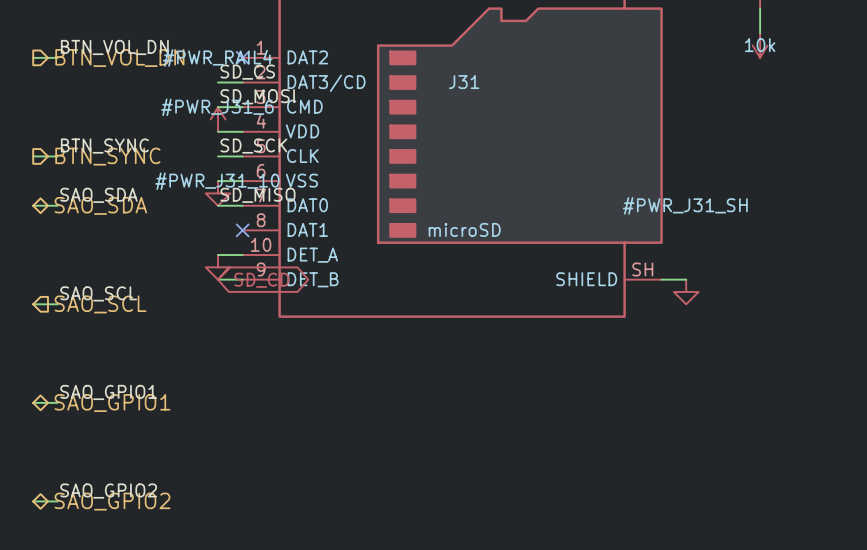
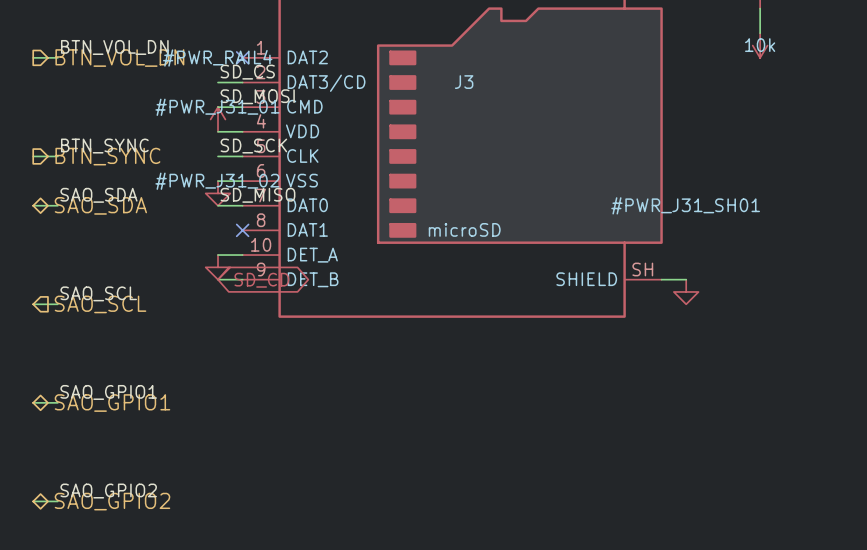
J31 name: J31 (464, 82) -> J3 (464, 82)
#PWR_J31_6 name: #PWR_J31_6 (217, 107) -> #PWR_J31_01 (217, 107)
#PWR_J31_10 name: #PWR_J31_10 (217, 181) -> #PWR_J31_02 (217, 181)
#PWR_J31_SH name: #PWR_J31_SH (685, 205) -> #PWR_J31_SH01 (685, 205)

